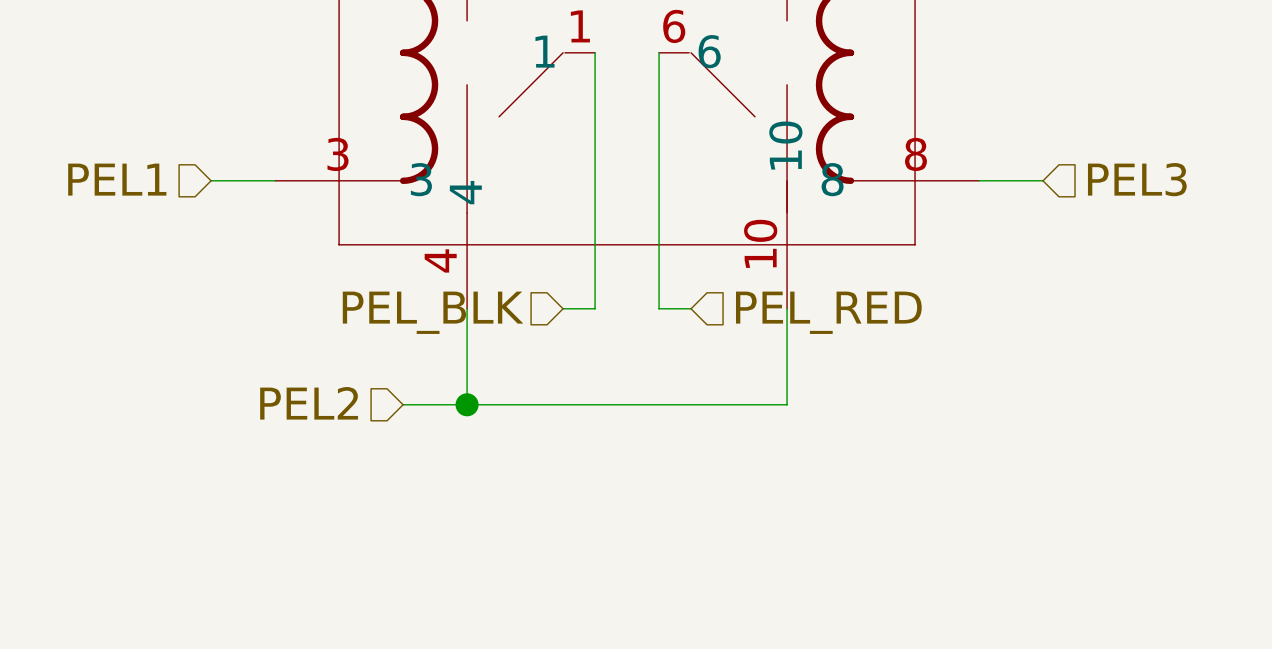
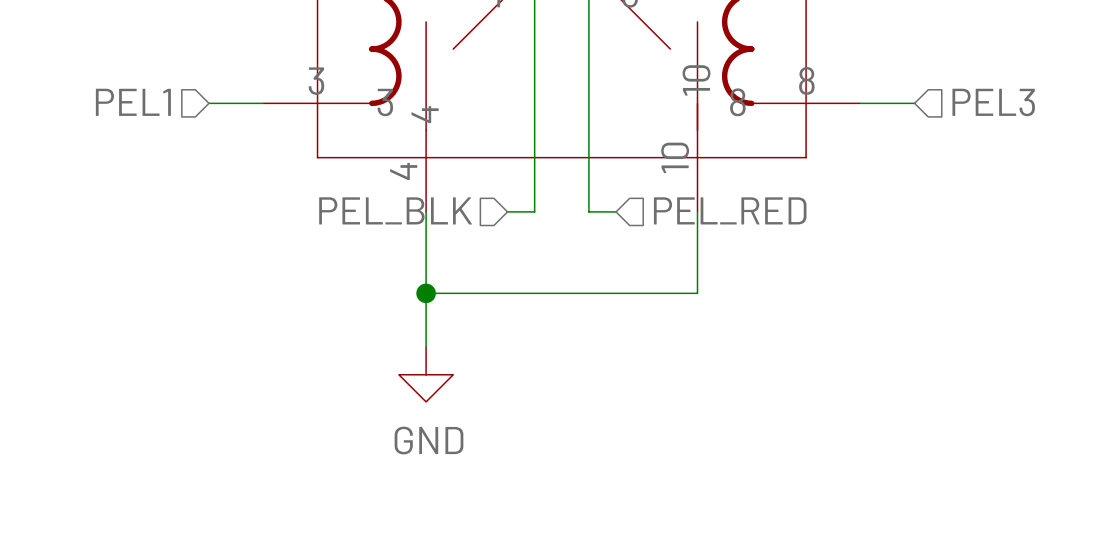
hierarchical label: PEL2 (309, 403) -> none
wire: (403, 404) (467, 404) -> (426, 347) (426, 293)
power symbol: none -> GND (426, 374)

